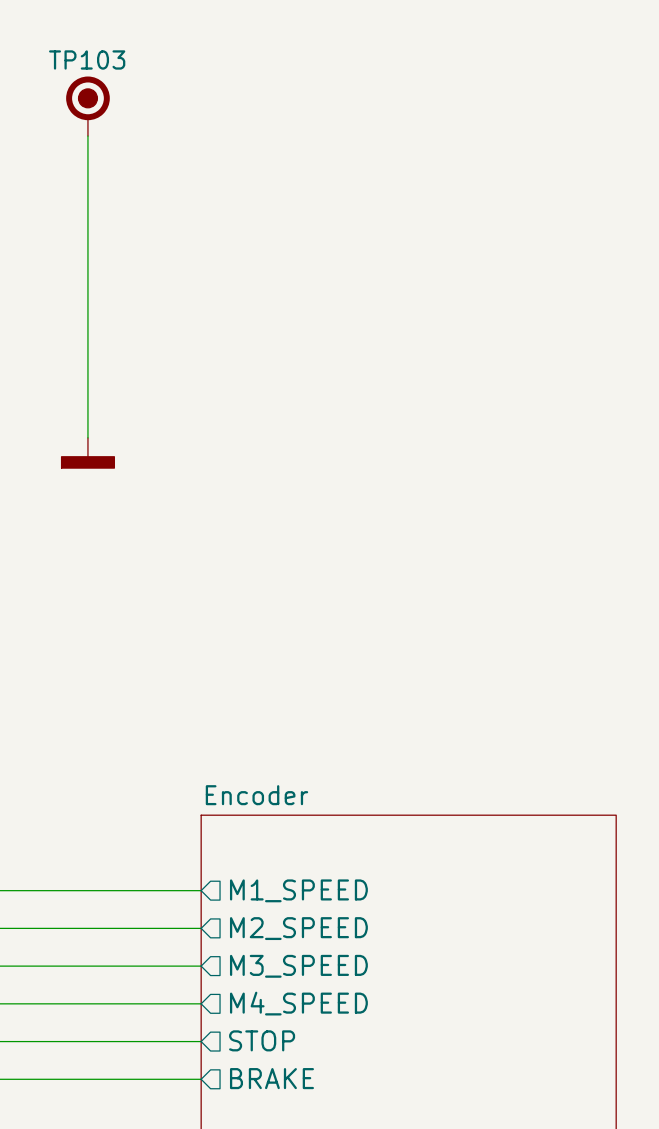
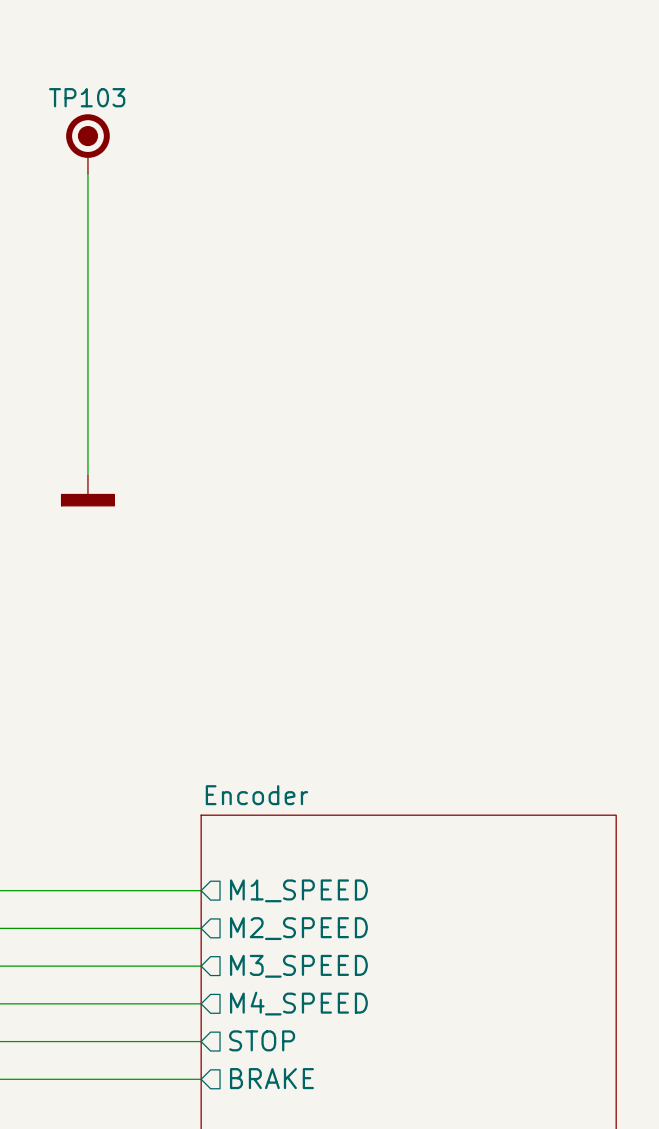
TP103 position: (87, 106) -> (87, 144)
power symbol position: (87, 453) -> (87, 490)

